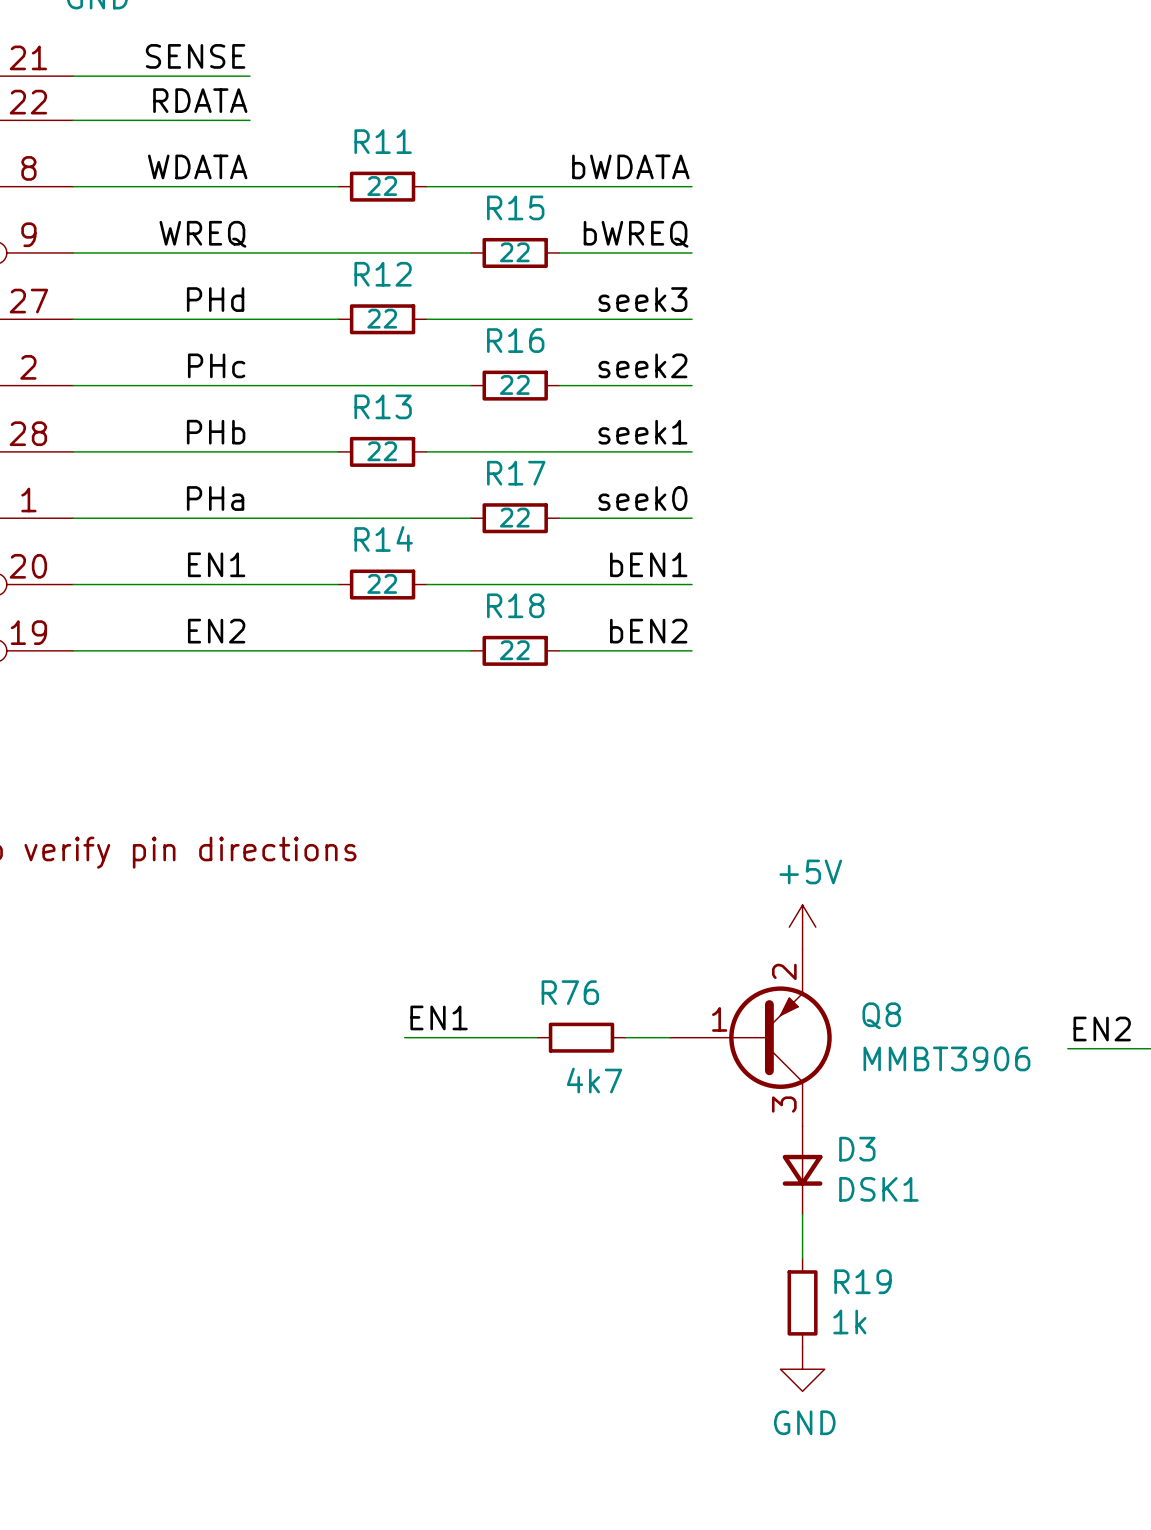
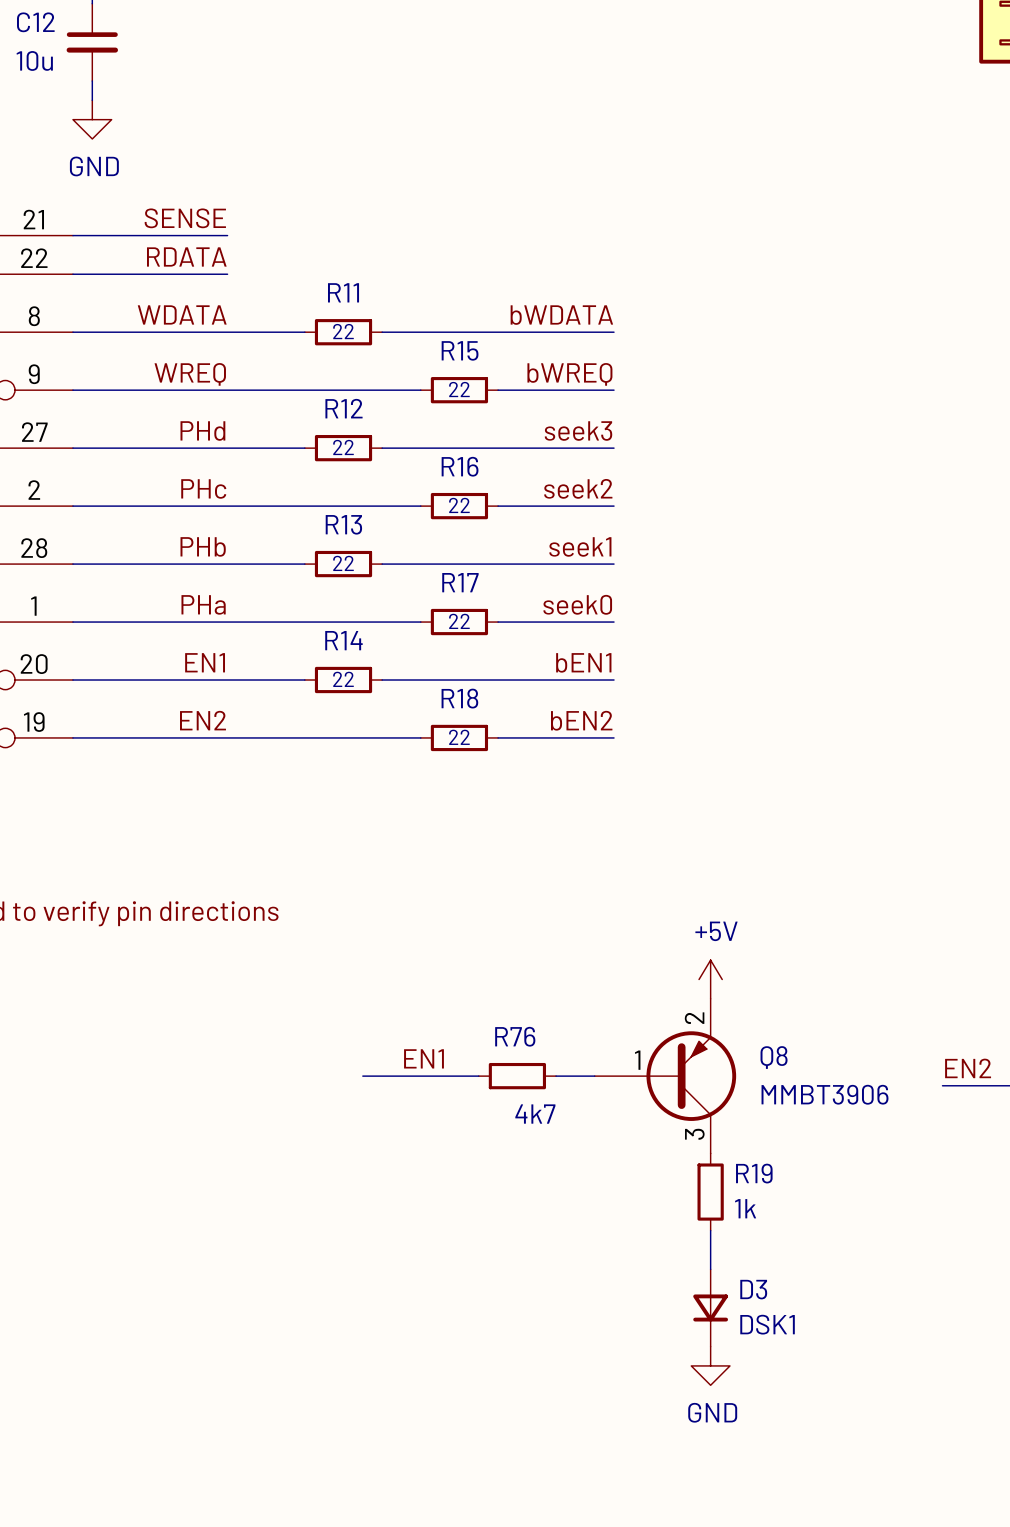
label position: EN1 (439, 1017) -> EN1 (424, 1058)
D3 position: (802, 1170) -> (710, 1307)
R19 position: (802, 1302) -> (710, 1192)

